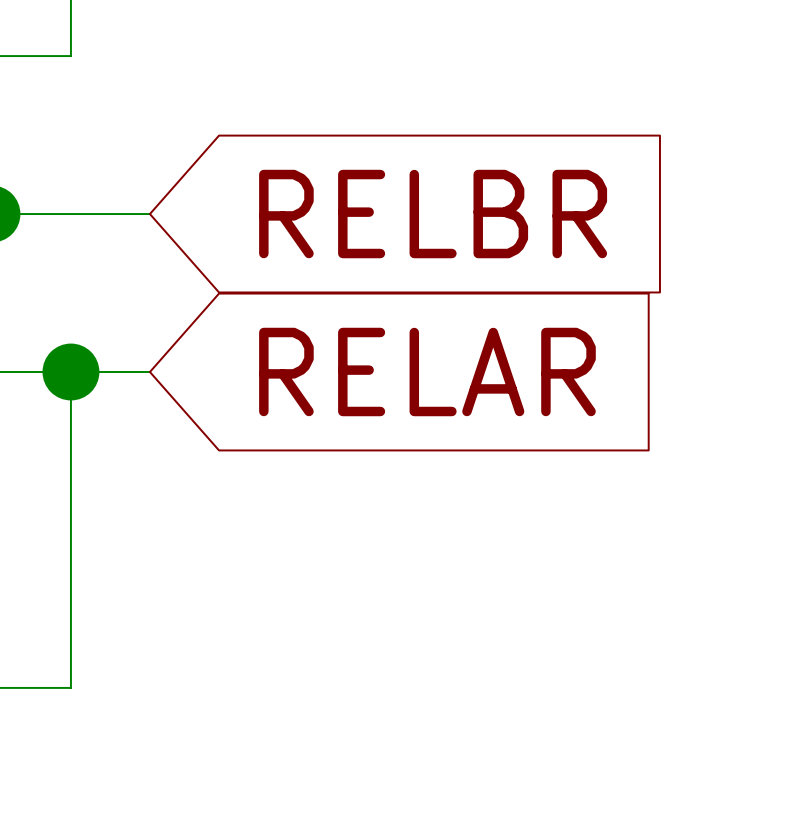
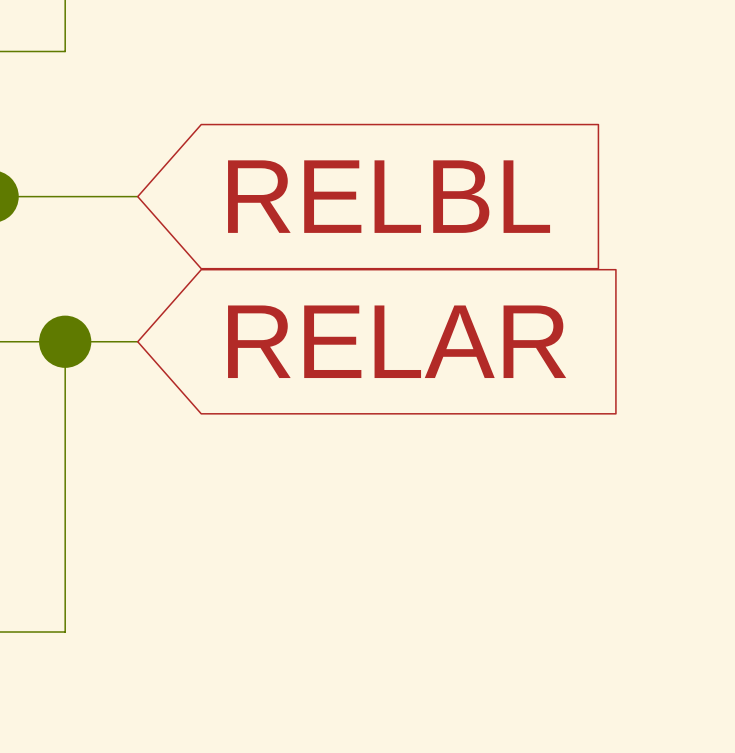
global label: RELBR (433, 214) -> RELBL (389, 196)

